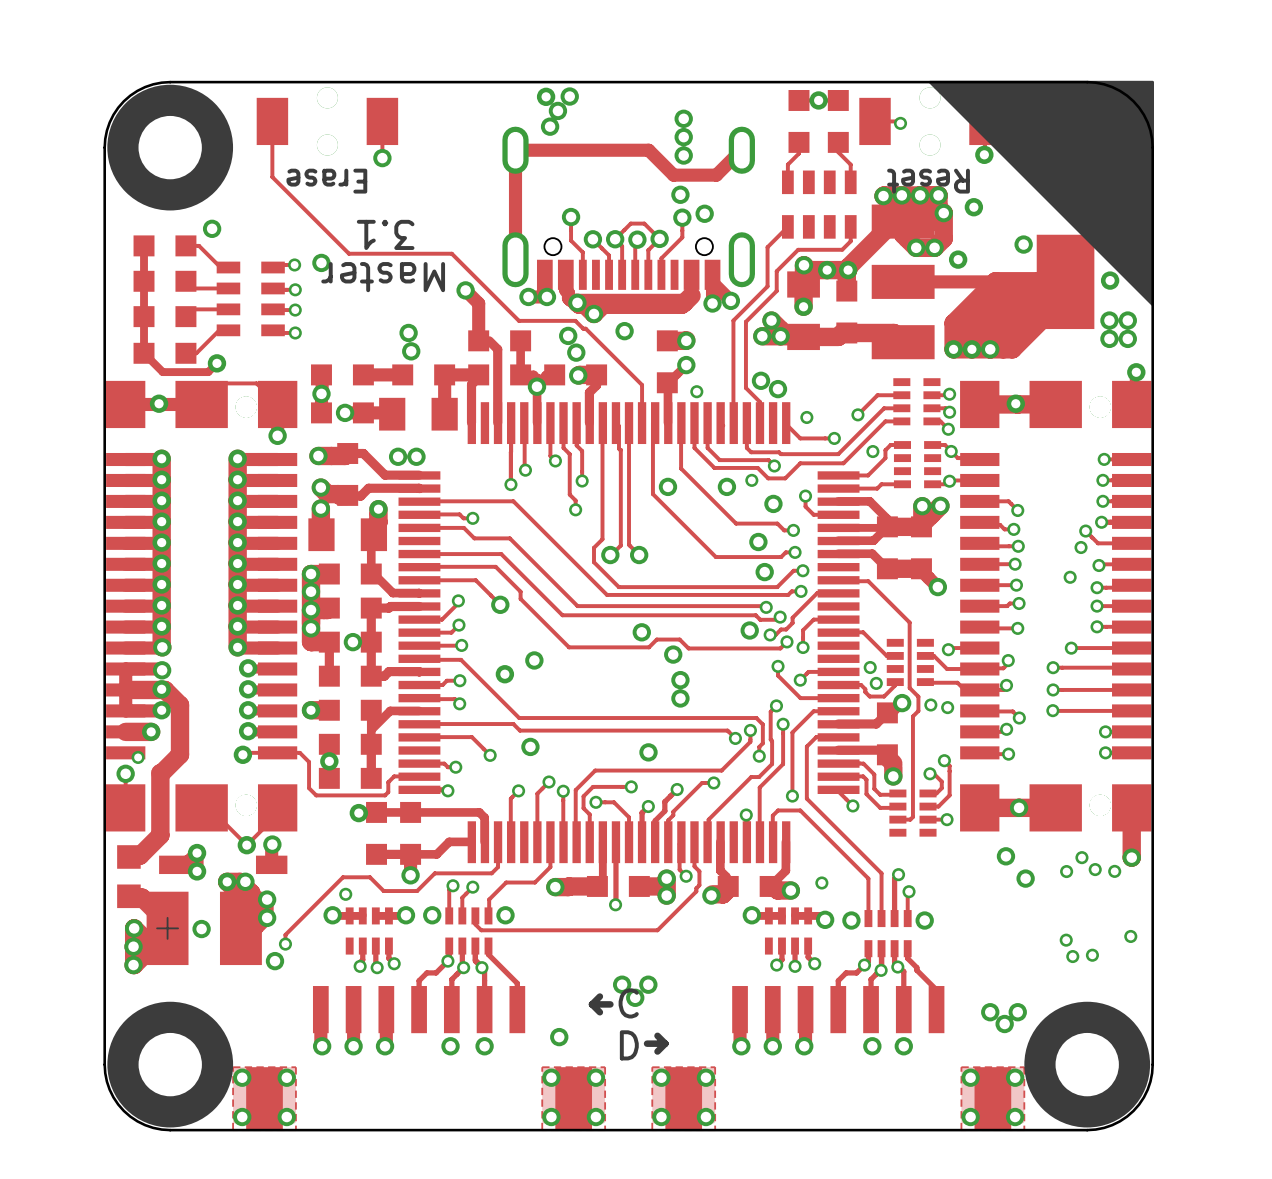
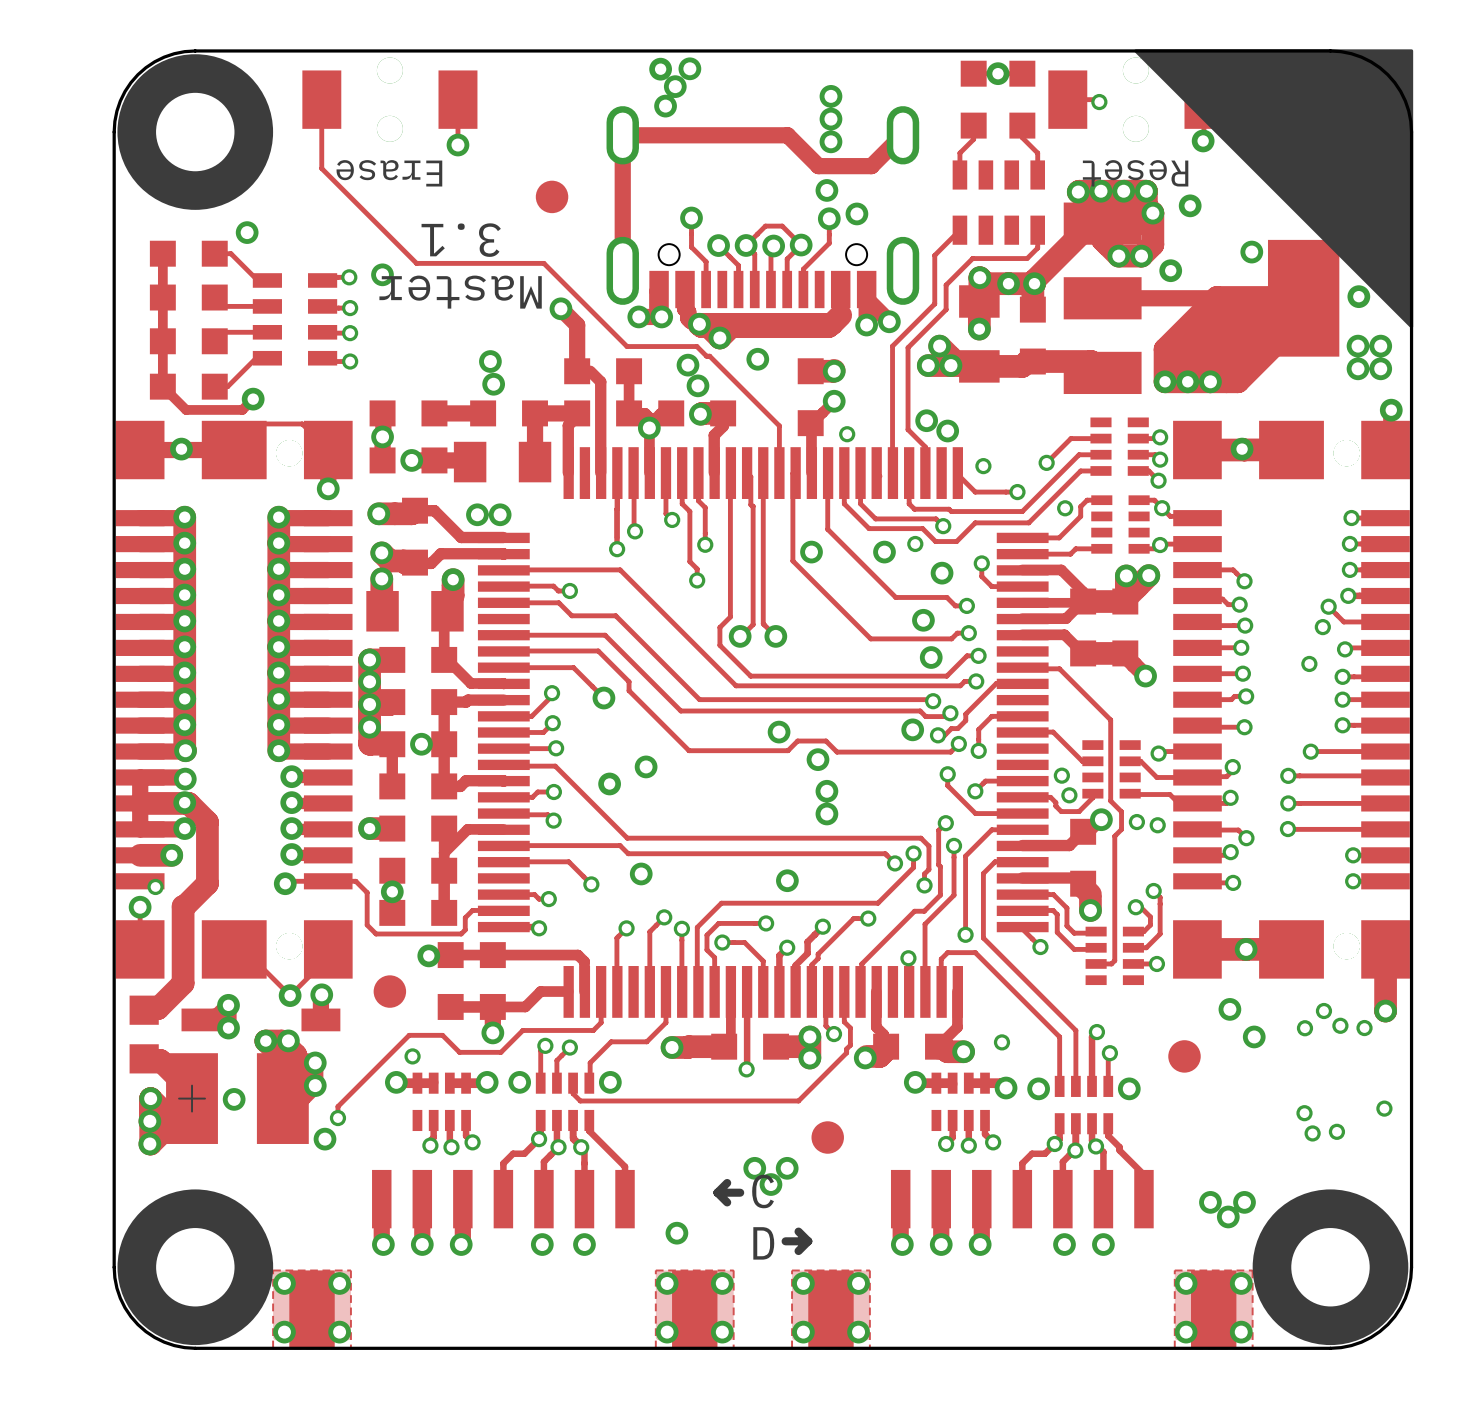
part: none -> (552, 196)
part: none -> (389, 991)
part: none -> (1184, 1056)
part: none -> (827, 1137)

